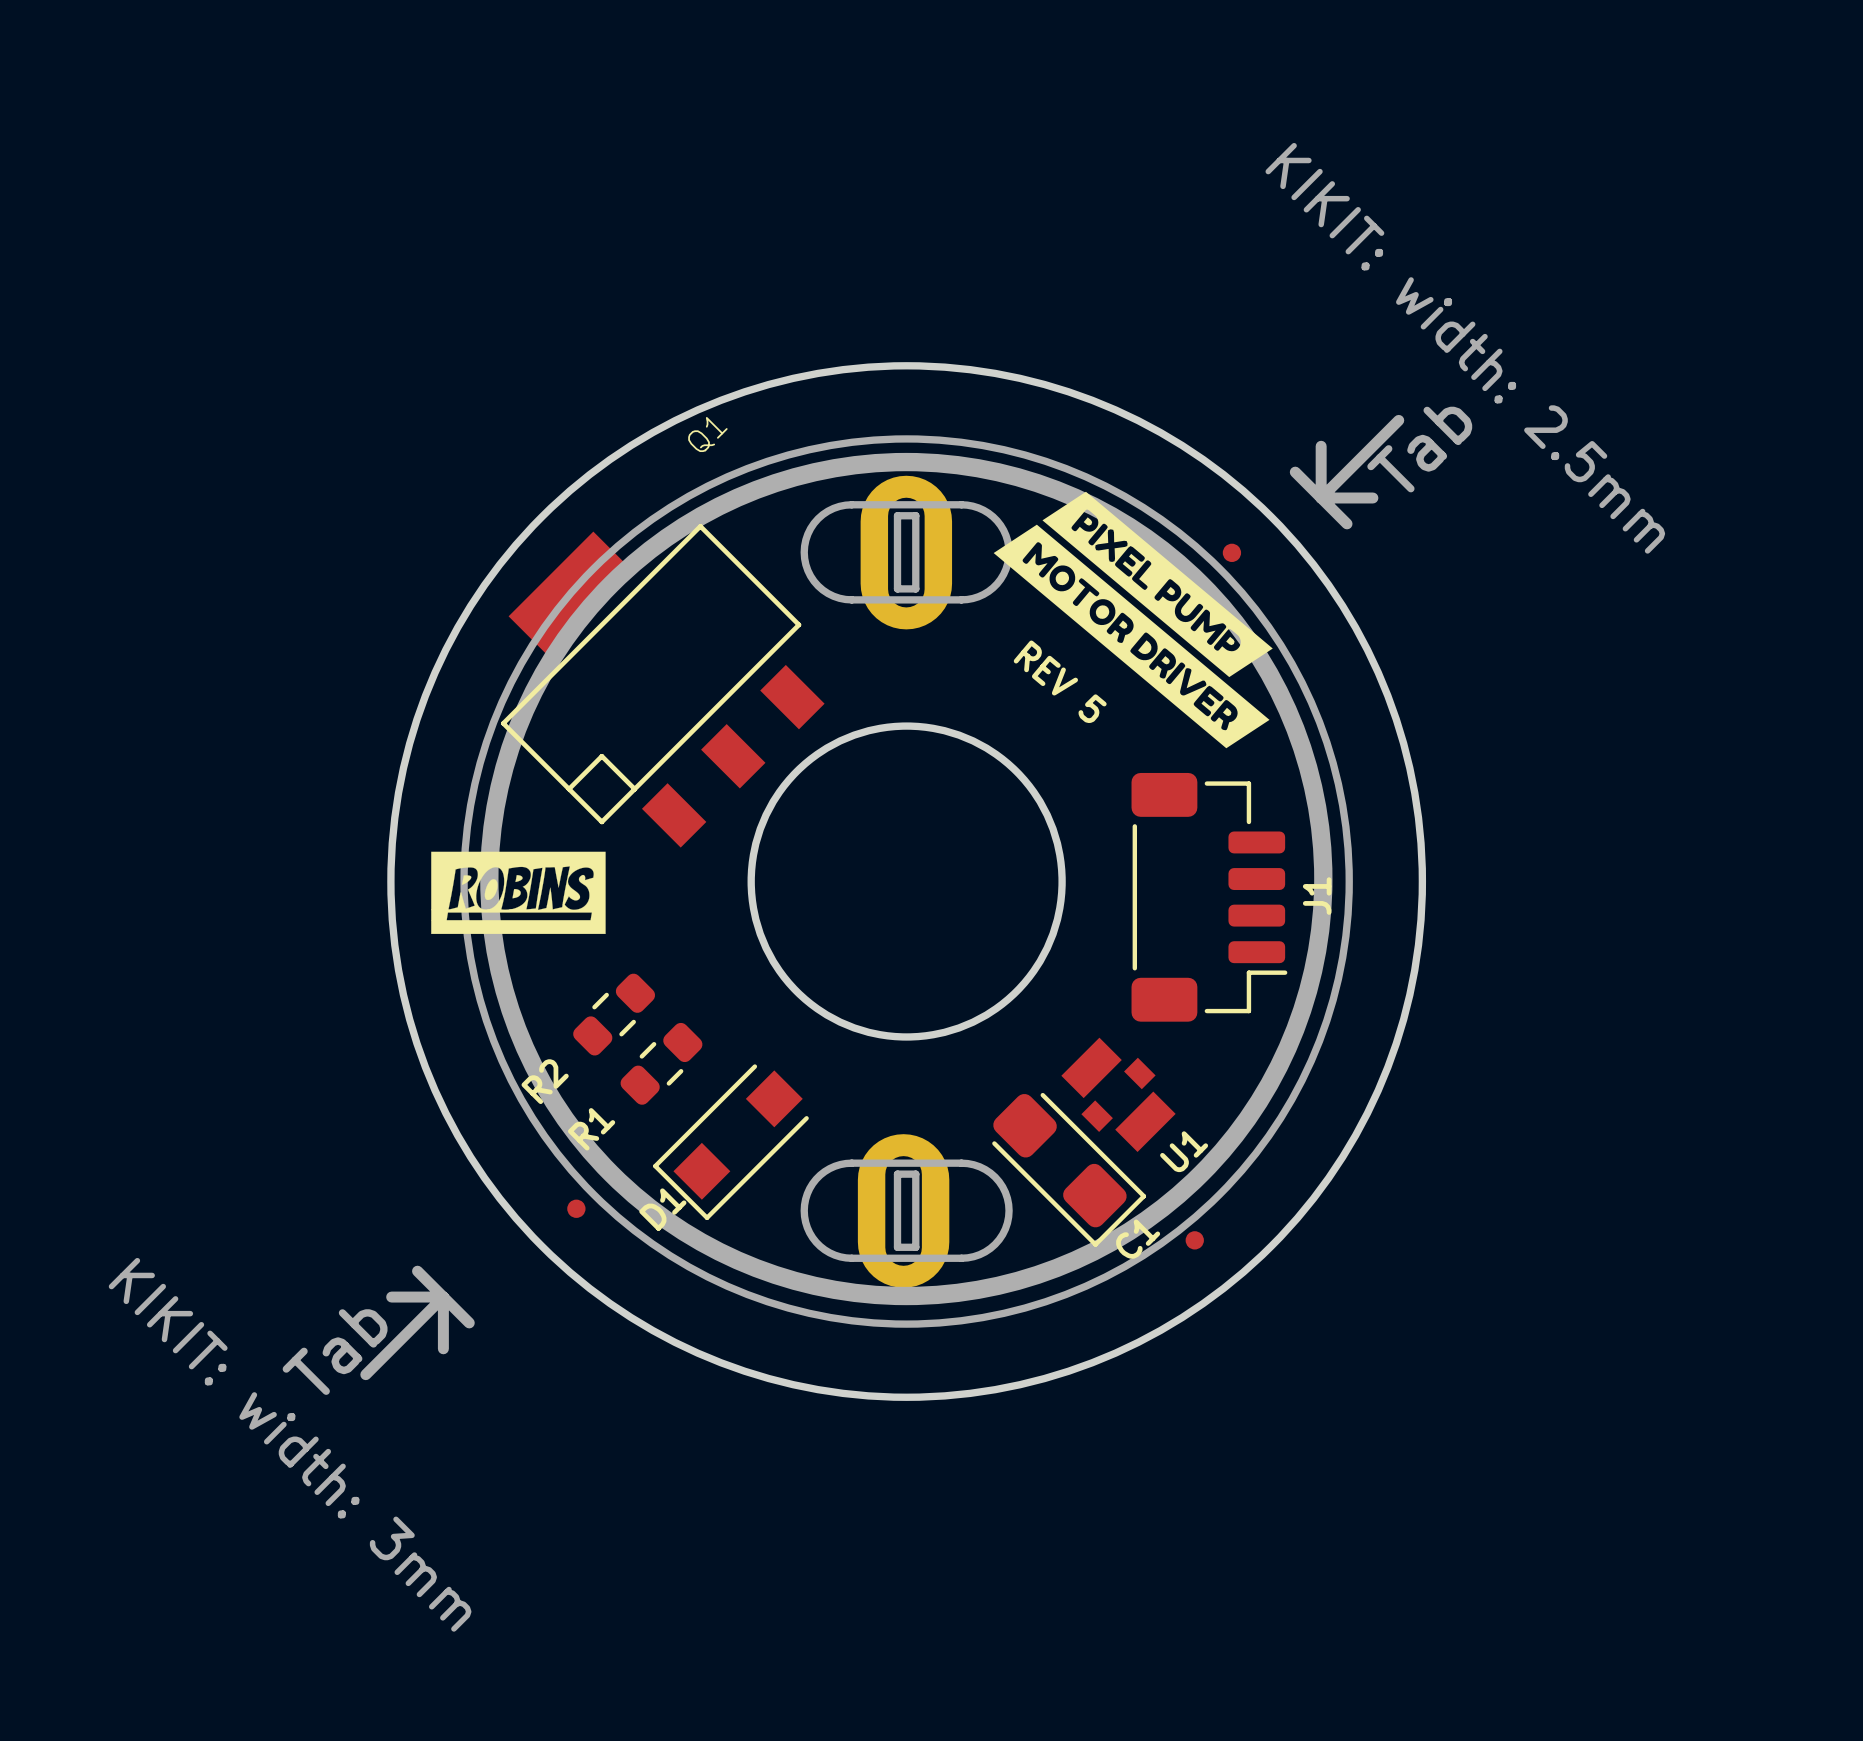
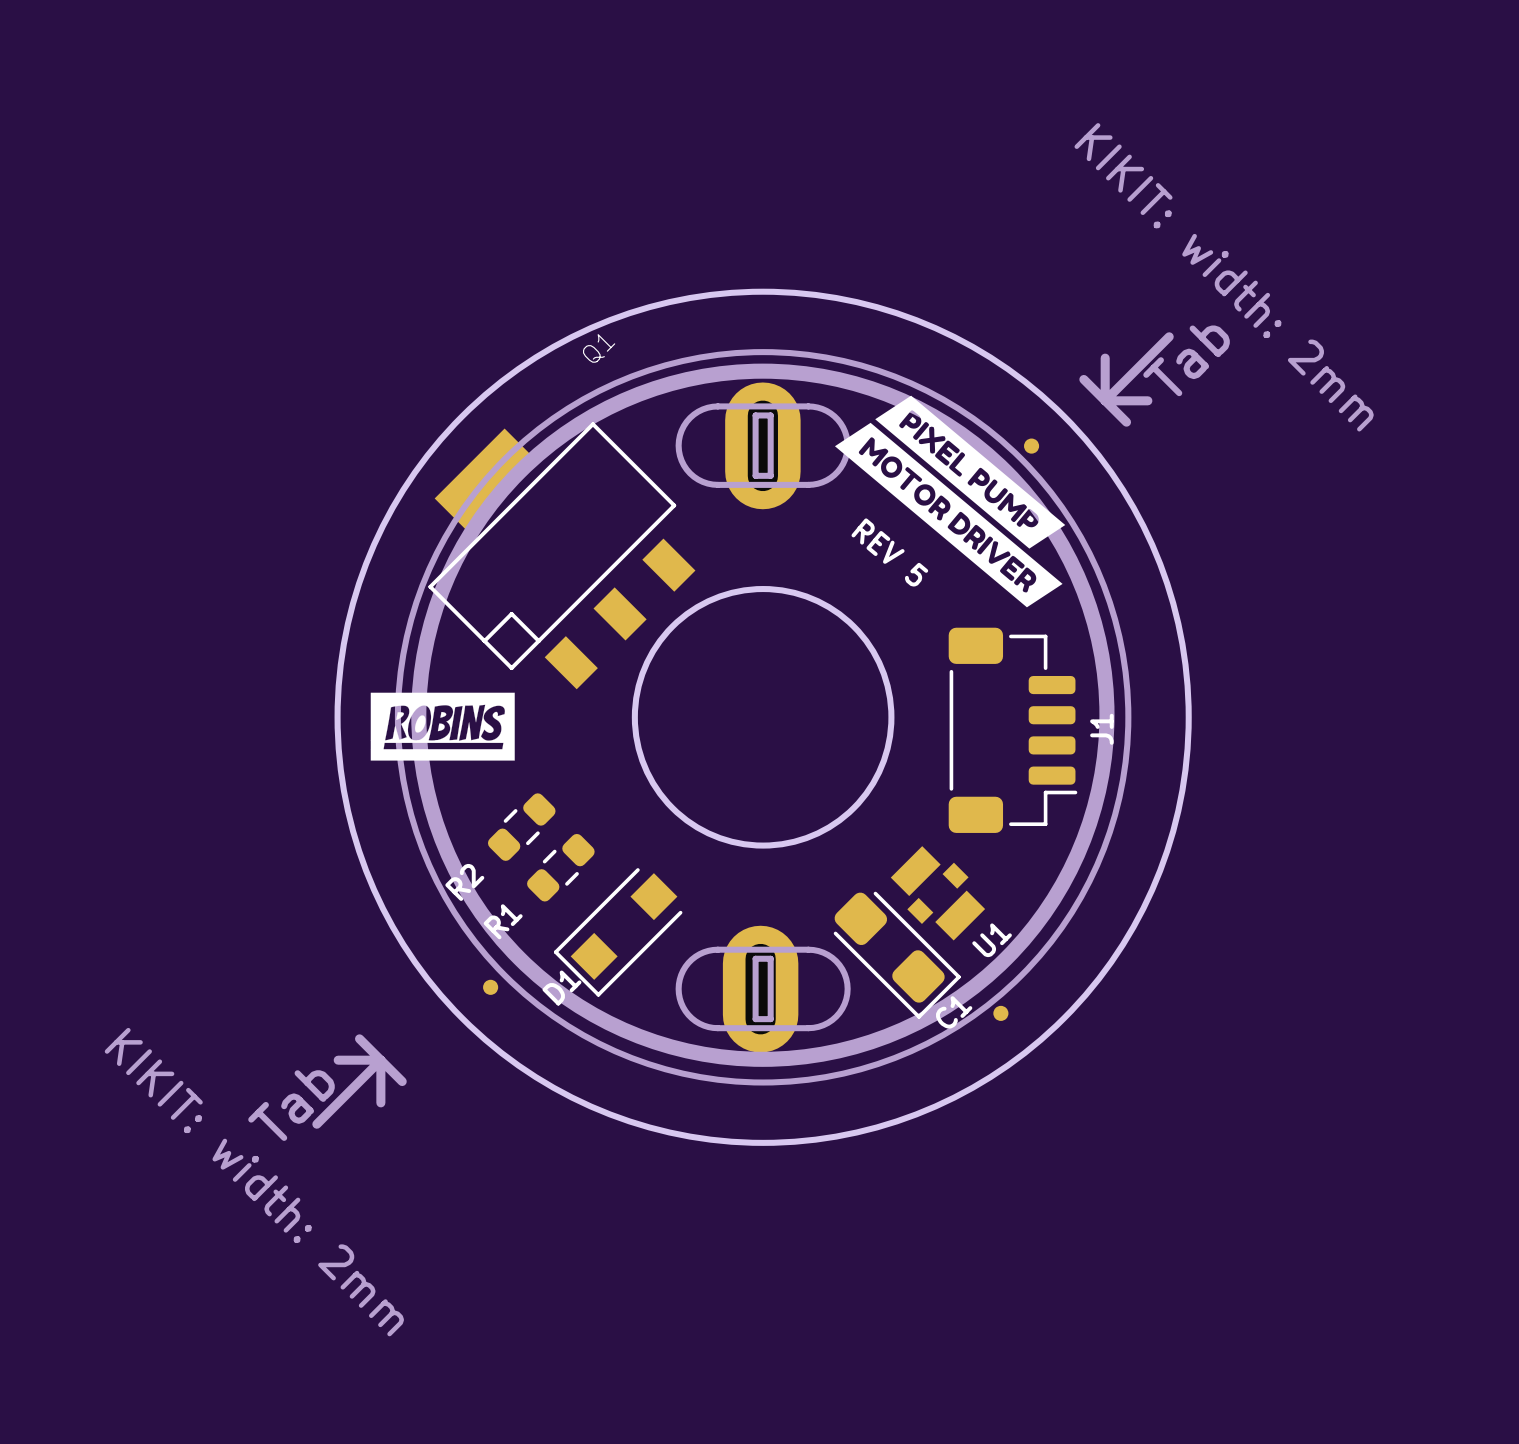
drawing shape: [1265, 142, 1666, 554] -> [1074, 123, 1374, 432]
drawing shape: [108, 1257, 475, 1632] -> [104, 1027, 407, 1337]

